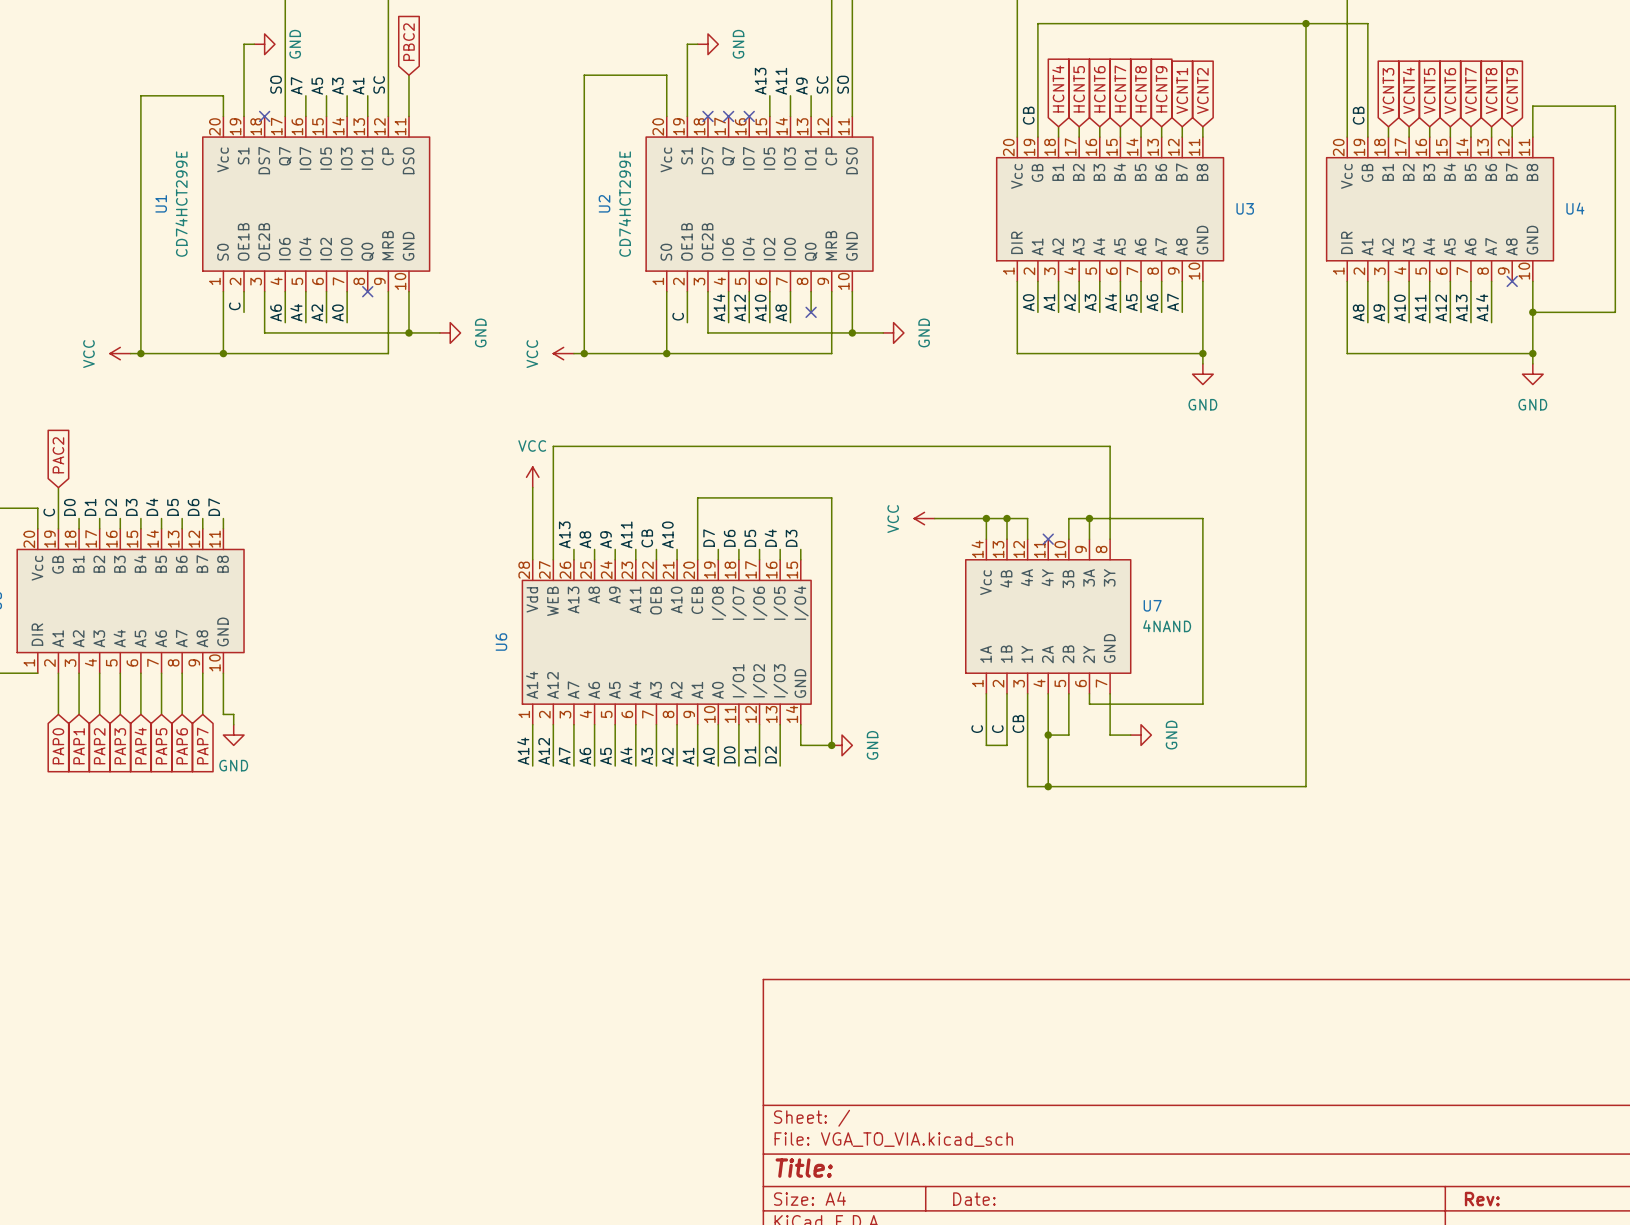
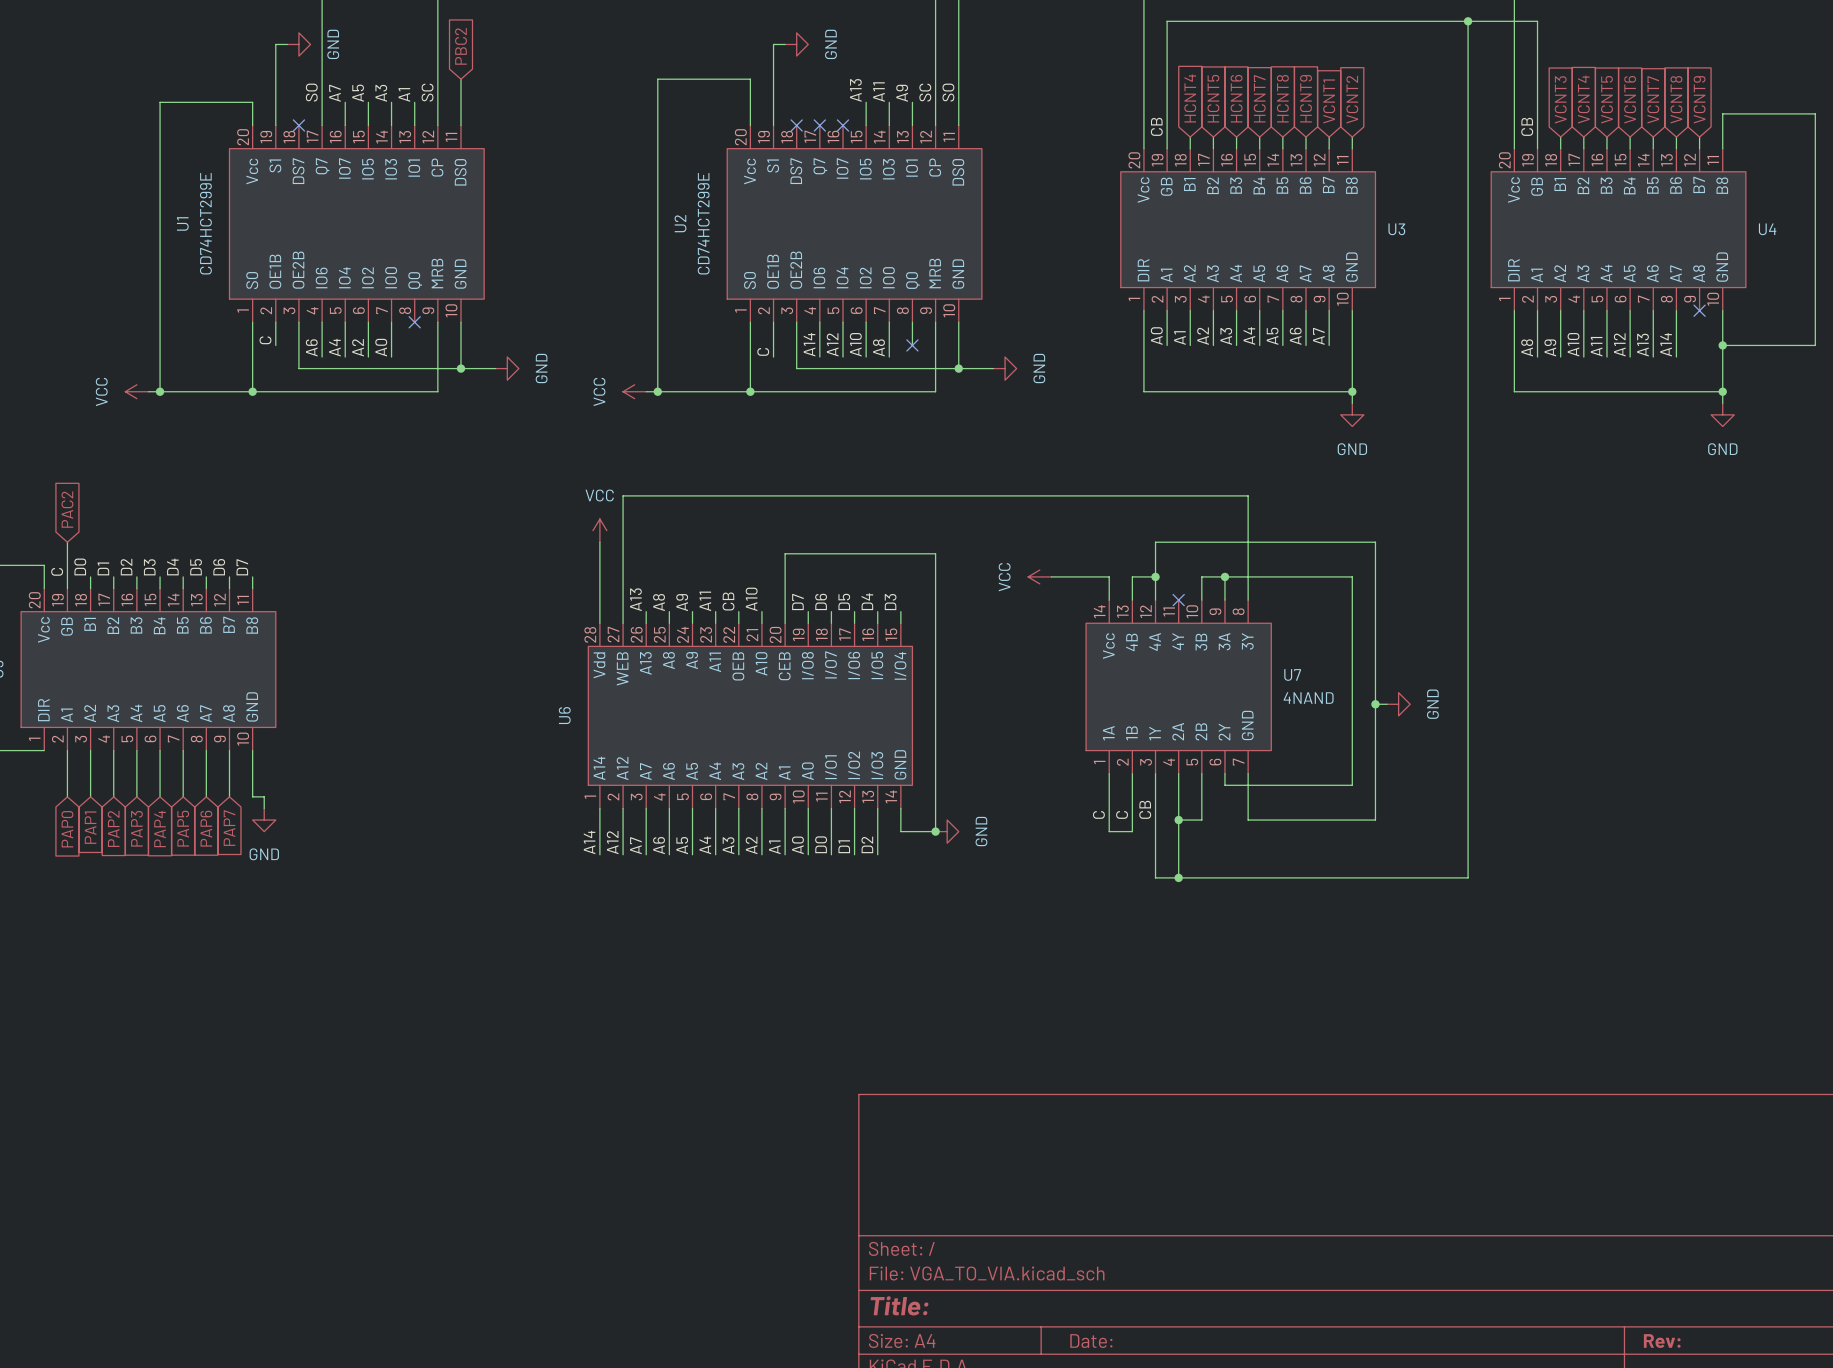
wire: (986, 518) (1006, 518) -> none
junction: (986, 518) -> none
junction: (1006, 518) -> none
wire: none -> (1155, 576) (1155, 542) (1375, 542) (1375, 820) (1271, 820)
junction: none -> (1155, 576)
wire: none -> (1375, 704) (1387, 704)
junction: none -> (1375, 704)
power symbol position: GND (1141, 735) -> GND (1398, 704)

